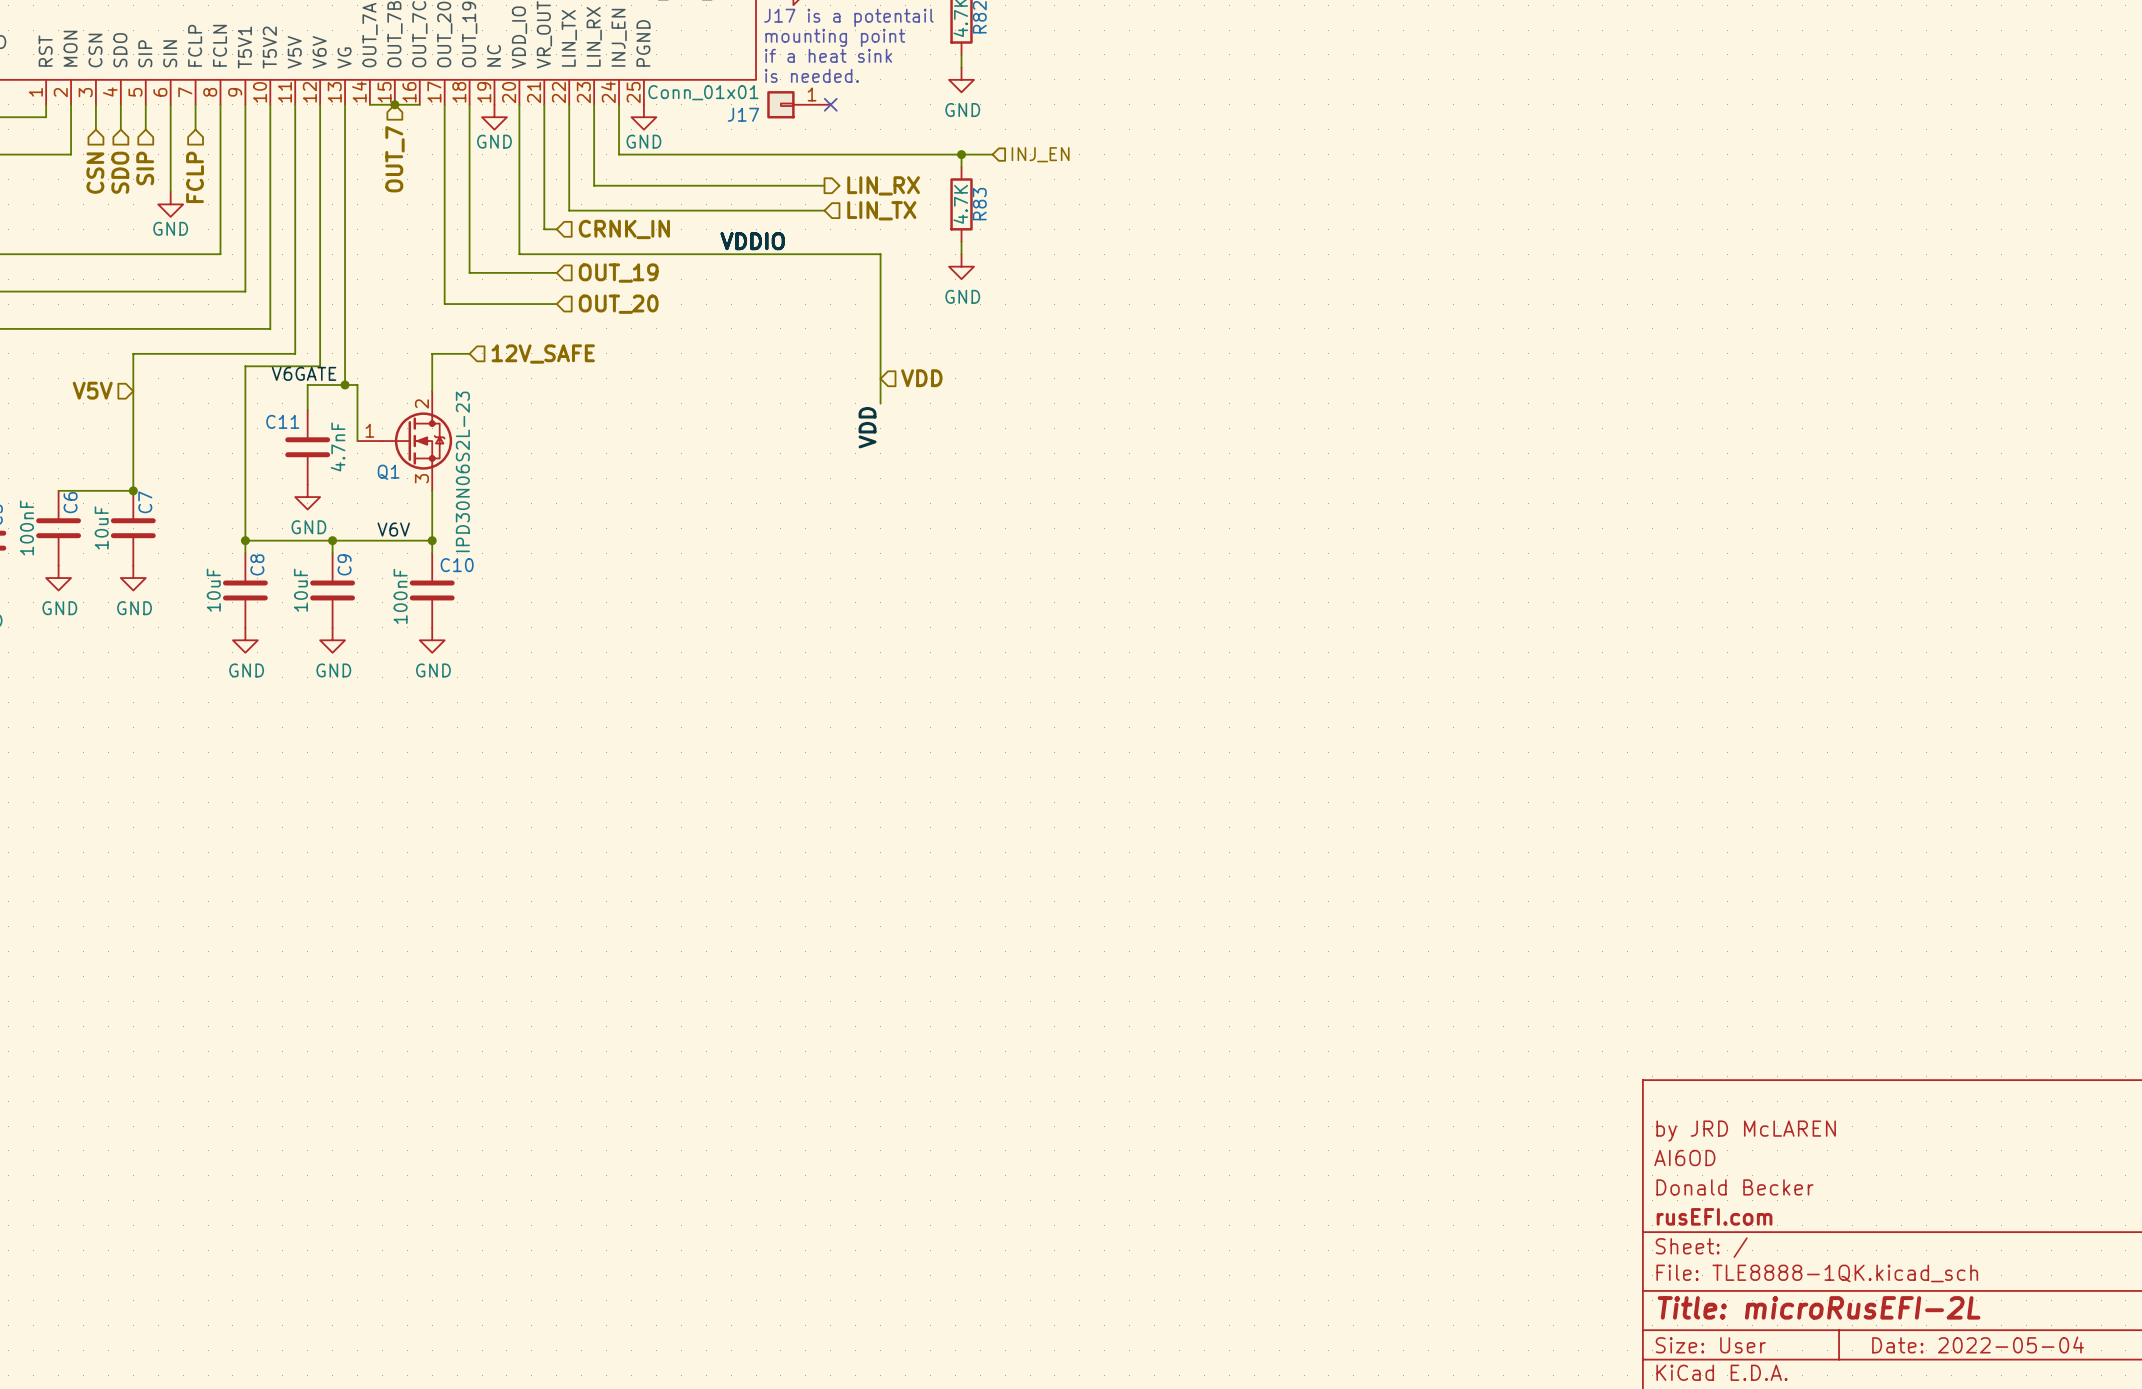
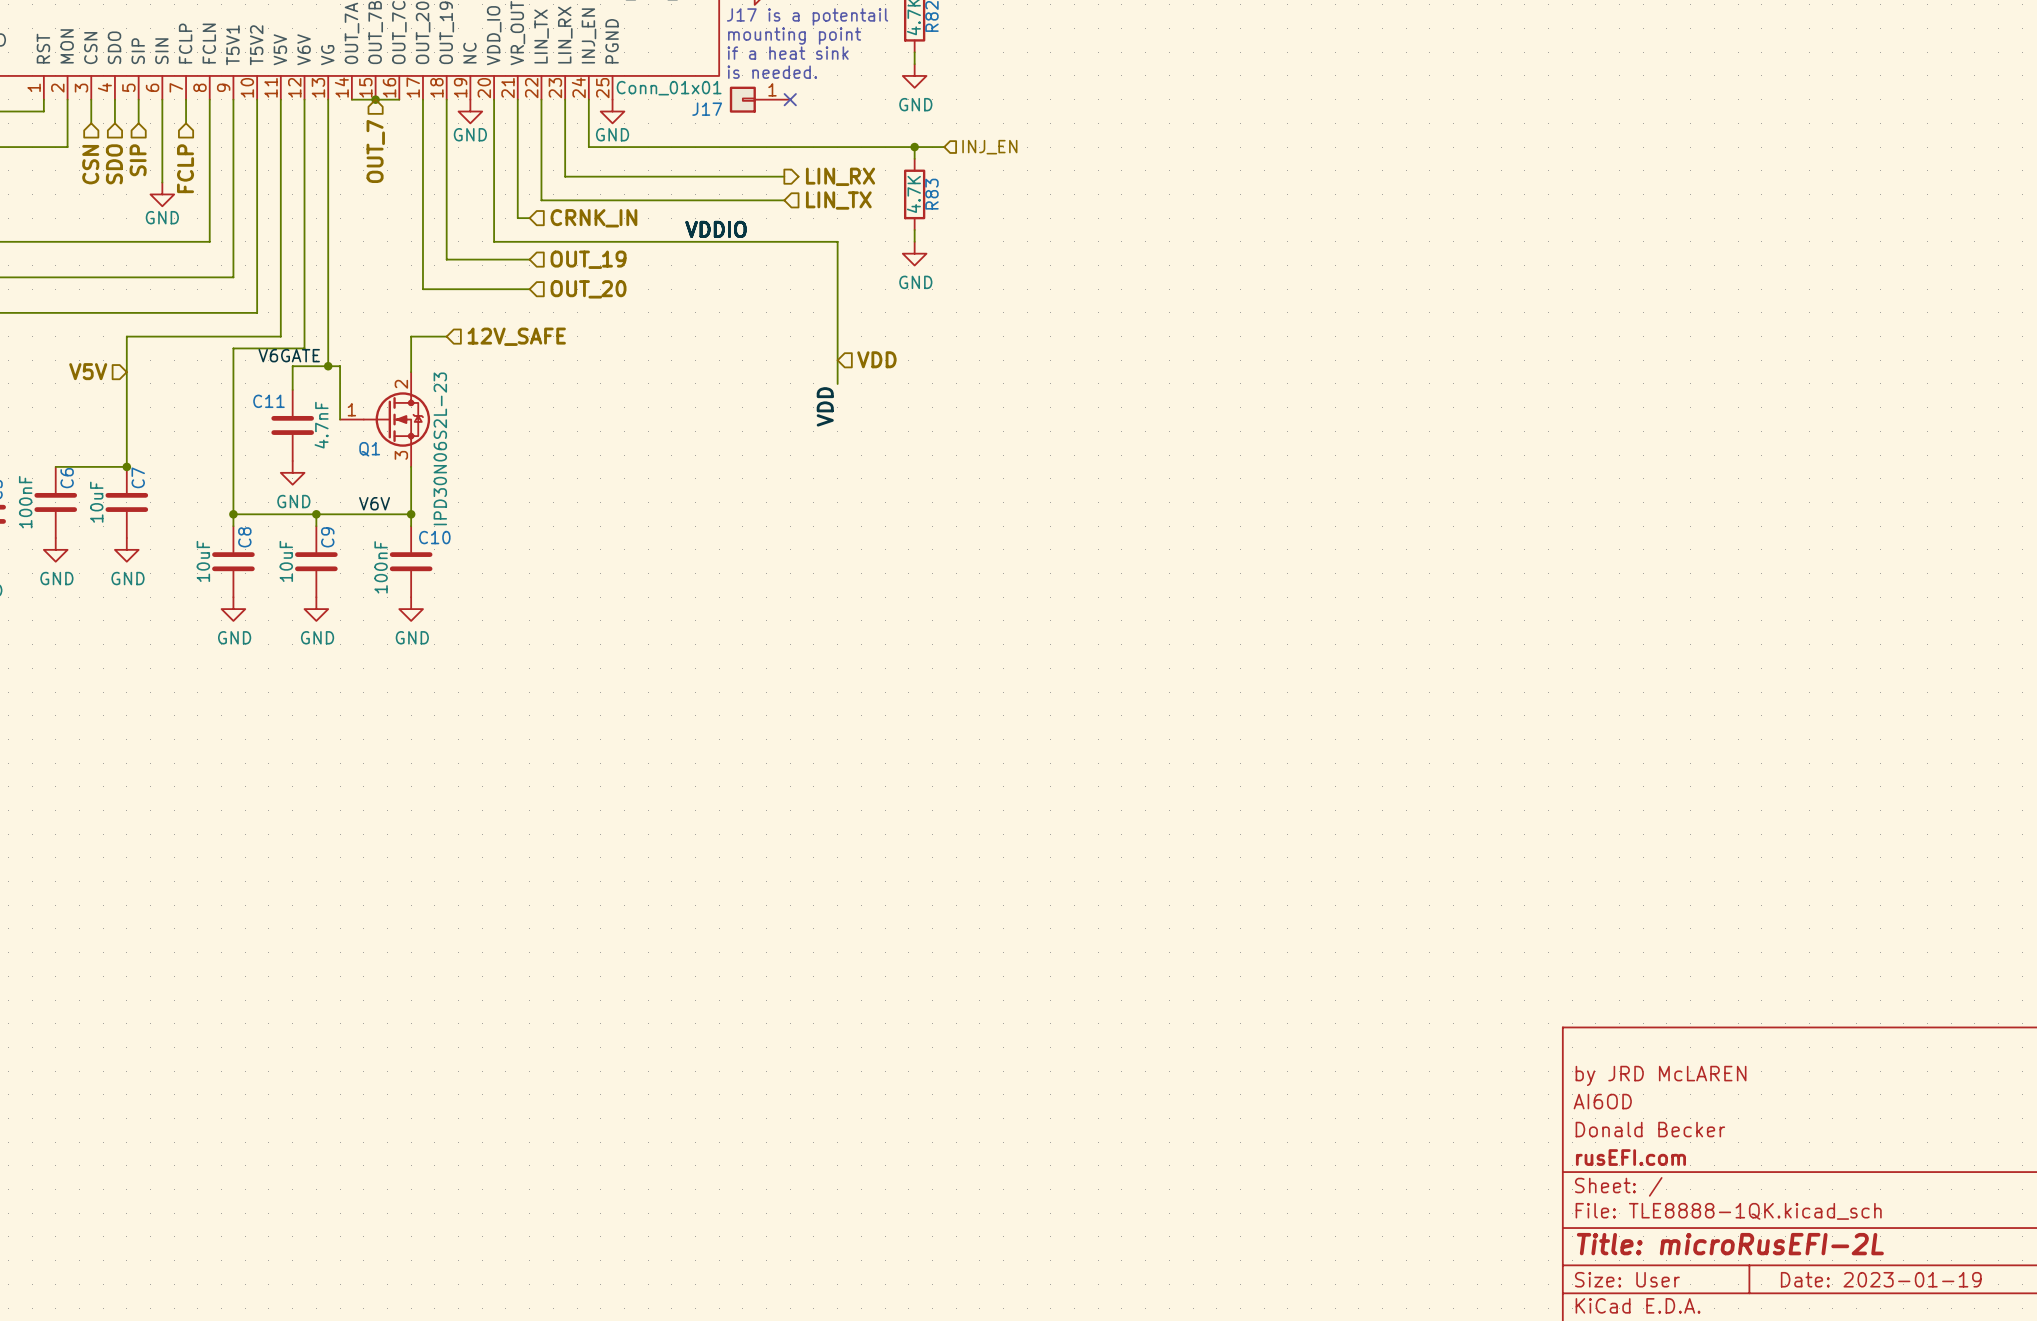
title block: Date: 2022-05-04 (1978, 1344) -> Date: 2023-01-19 (1881, 1279)

